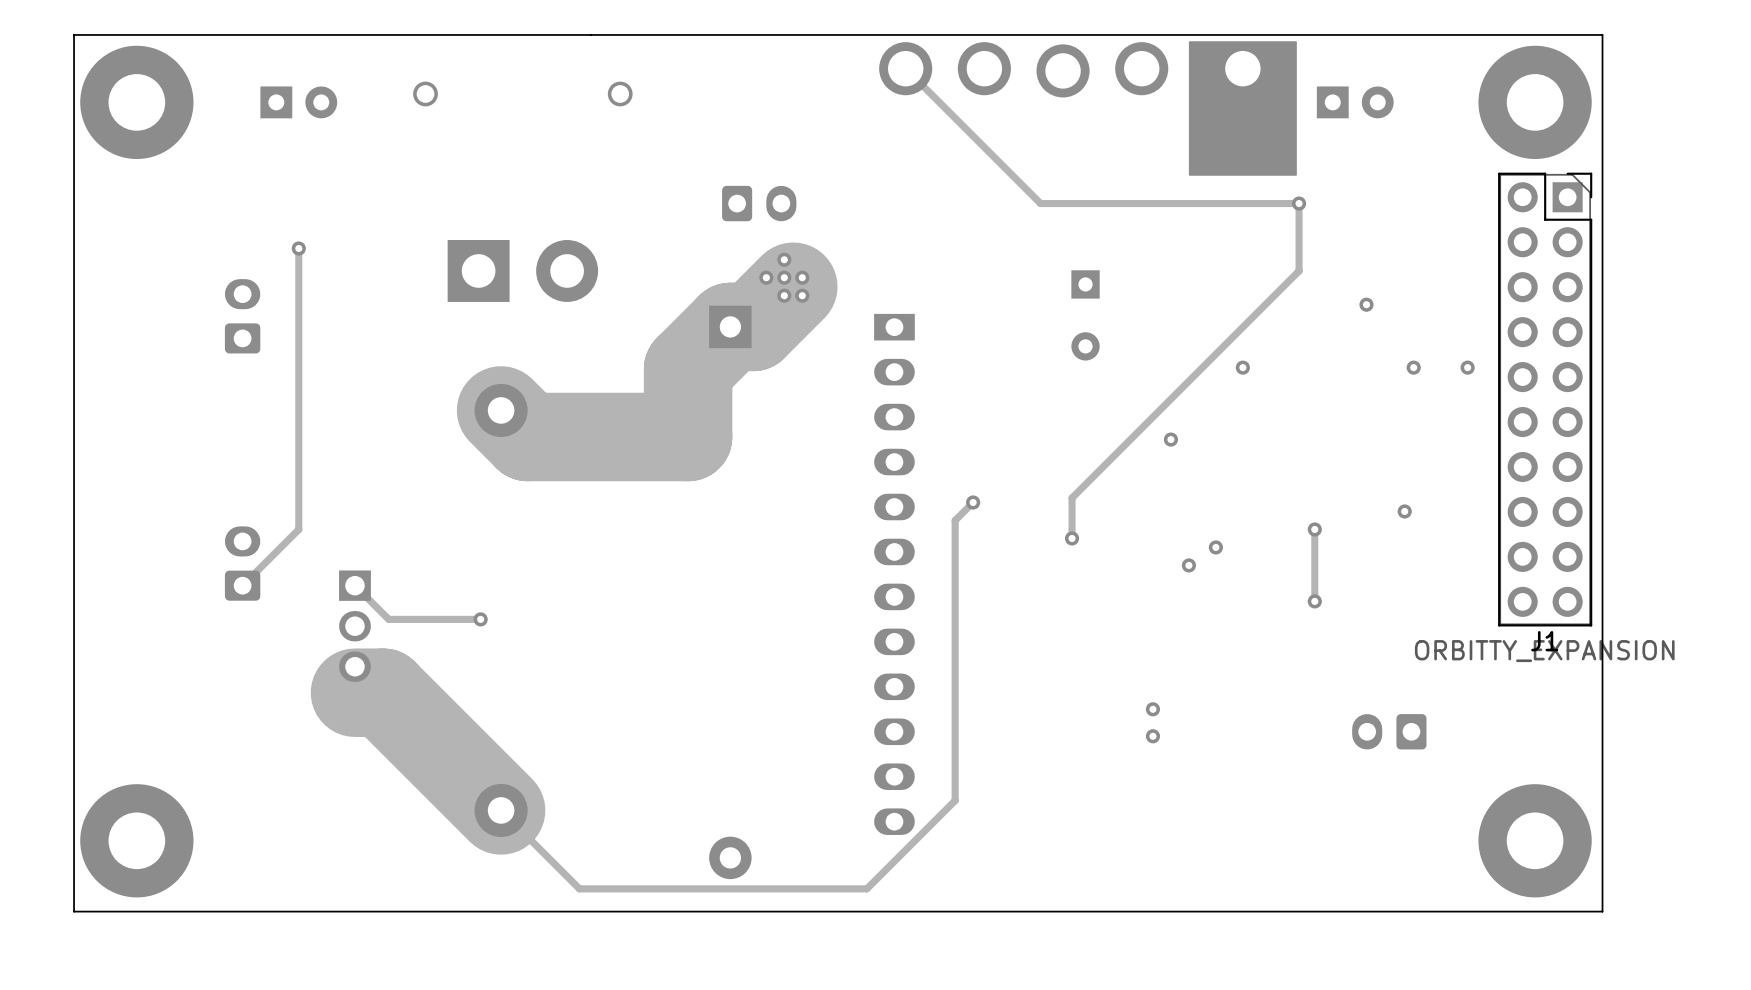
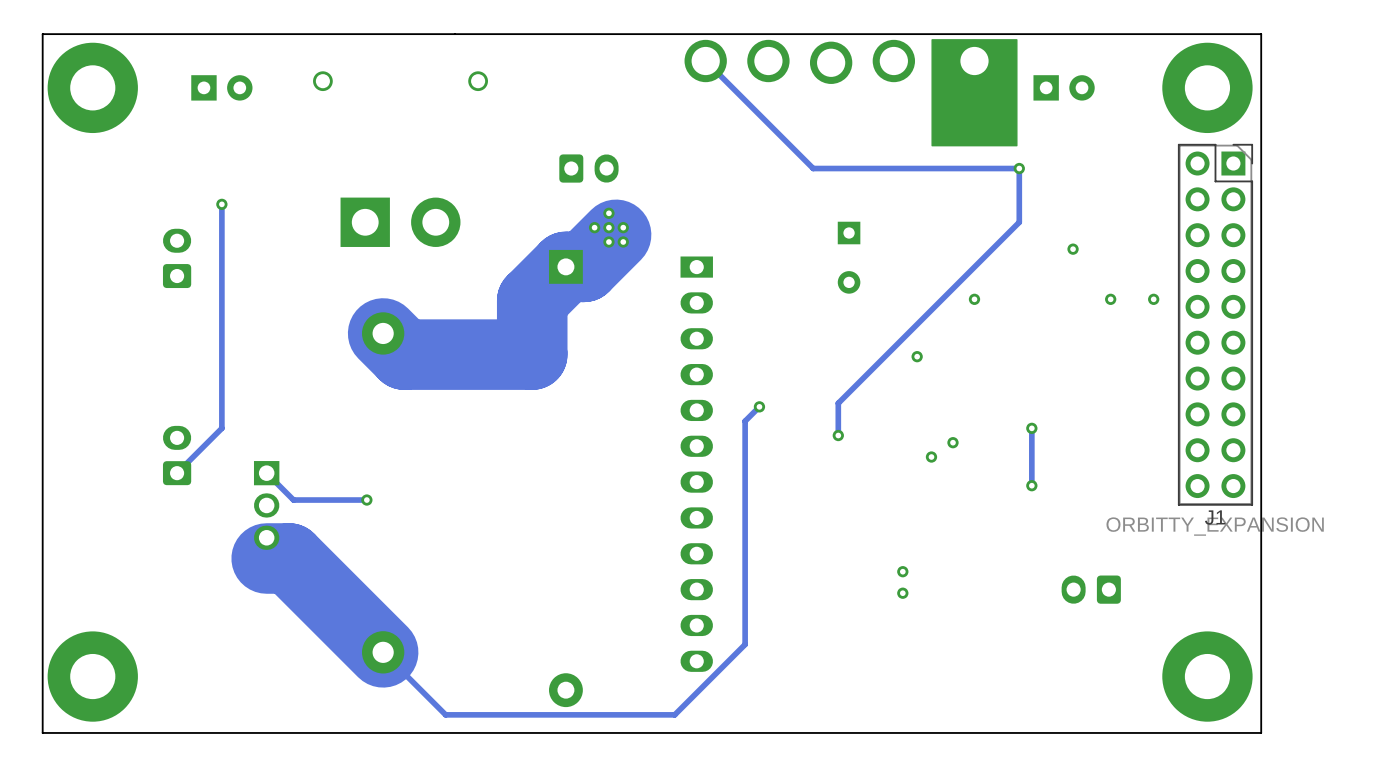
via: (1404, 511) -> none

